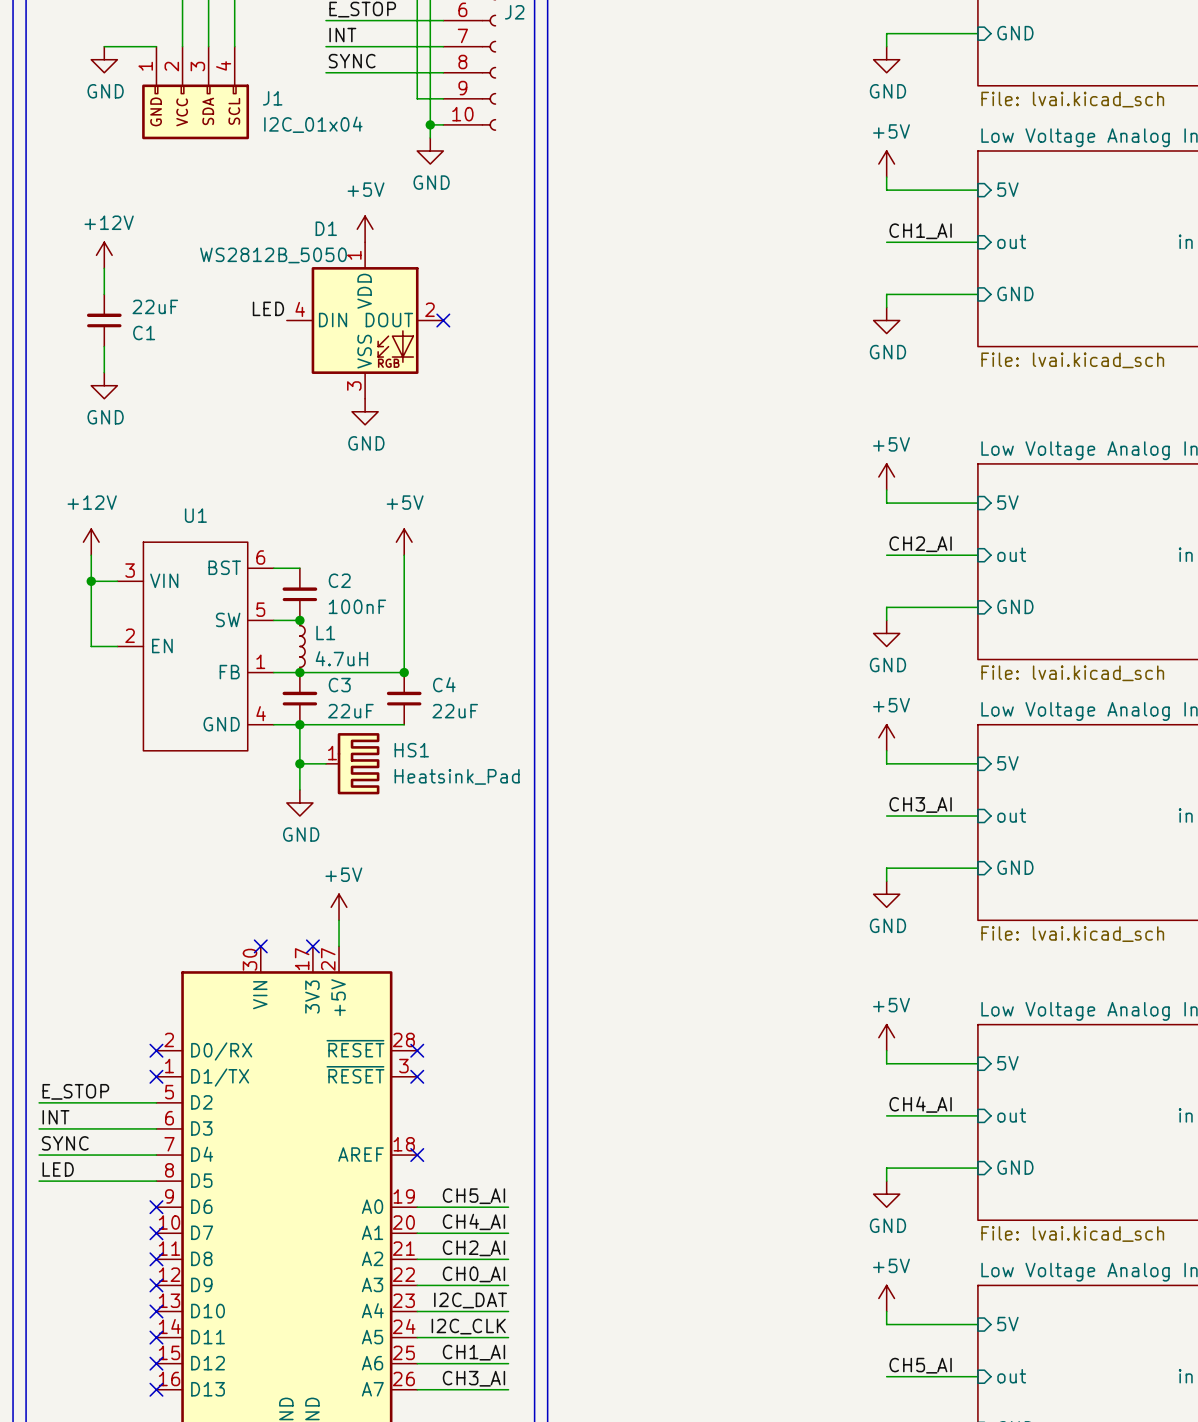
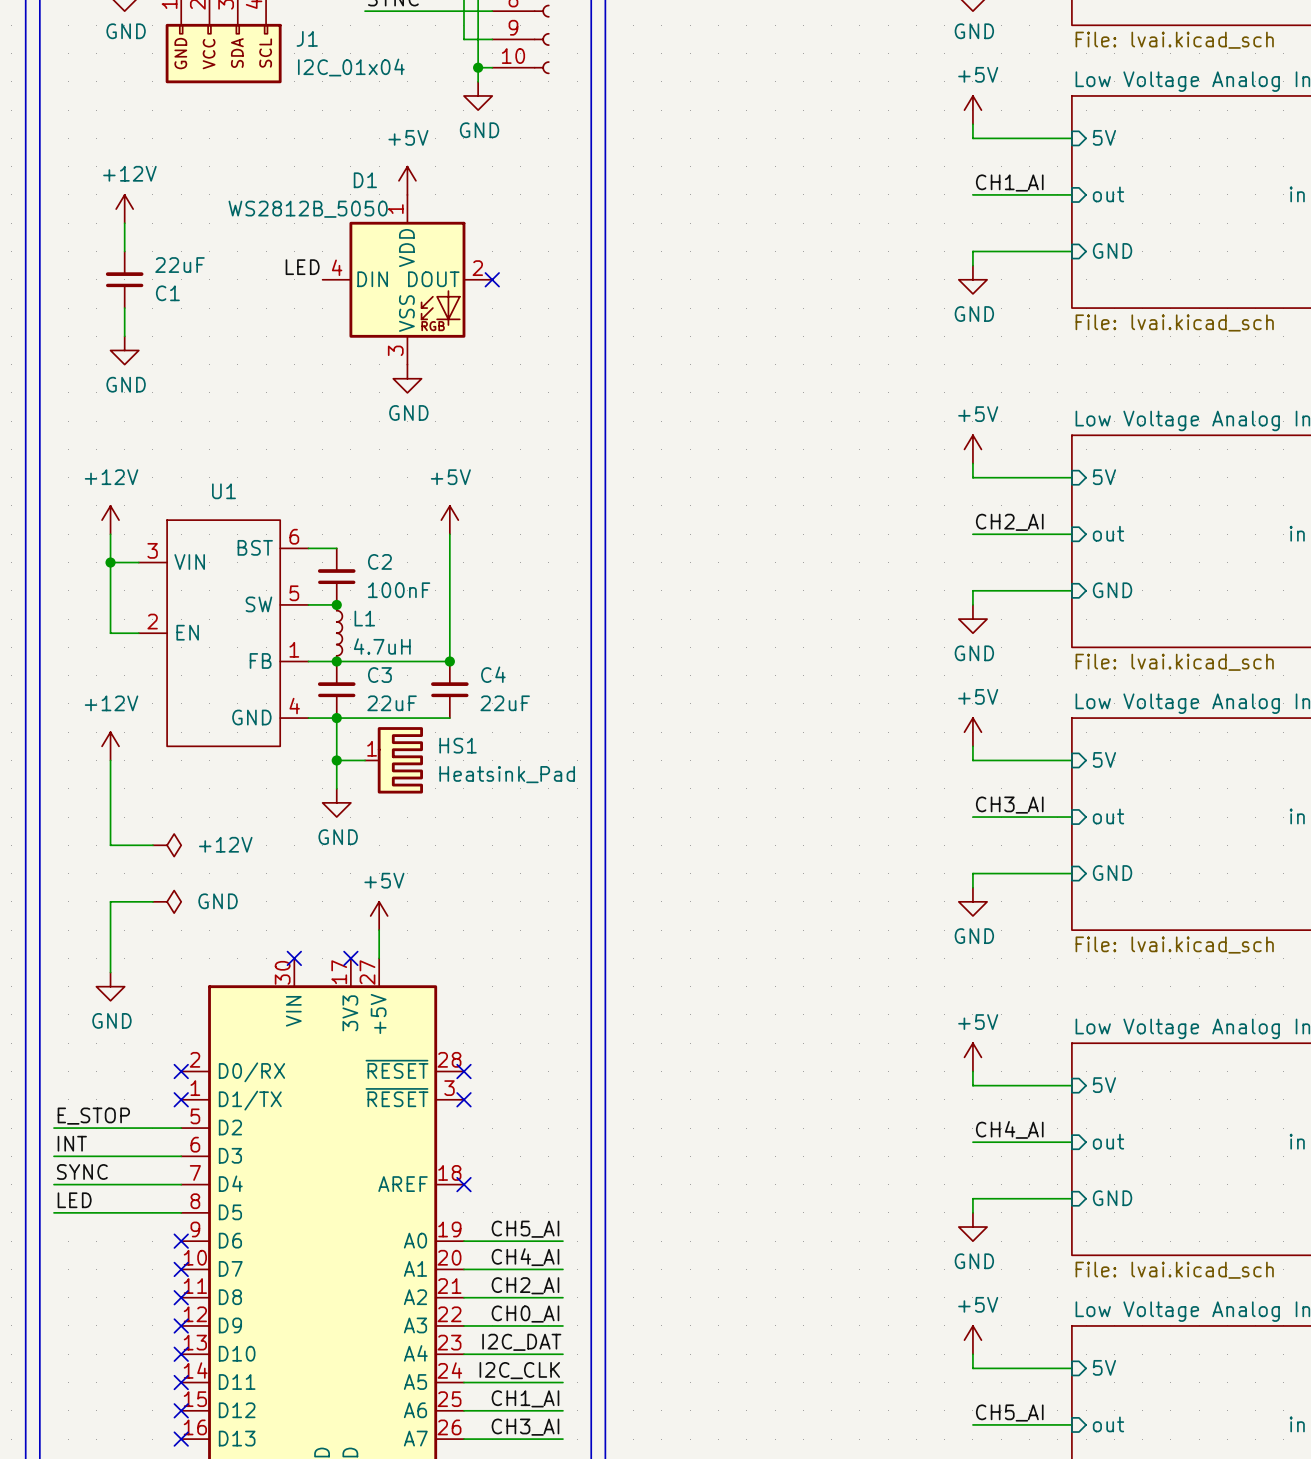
power symbol: none -> +12V (110, 746)
wire: none -> (110, 760) (110, 845) (152, 845)
power symbol: none -> +12V (167, 845)
wire: none -> (152, 901) (110, 901) (110, 972)
power symbol: none -> GND (167, 901)
power symbol: none -> GND (110, 986)

